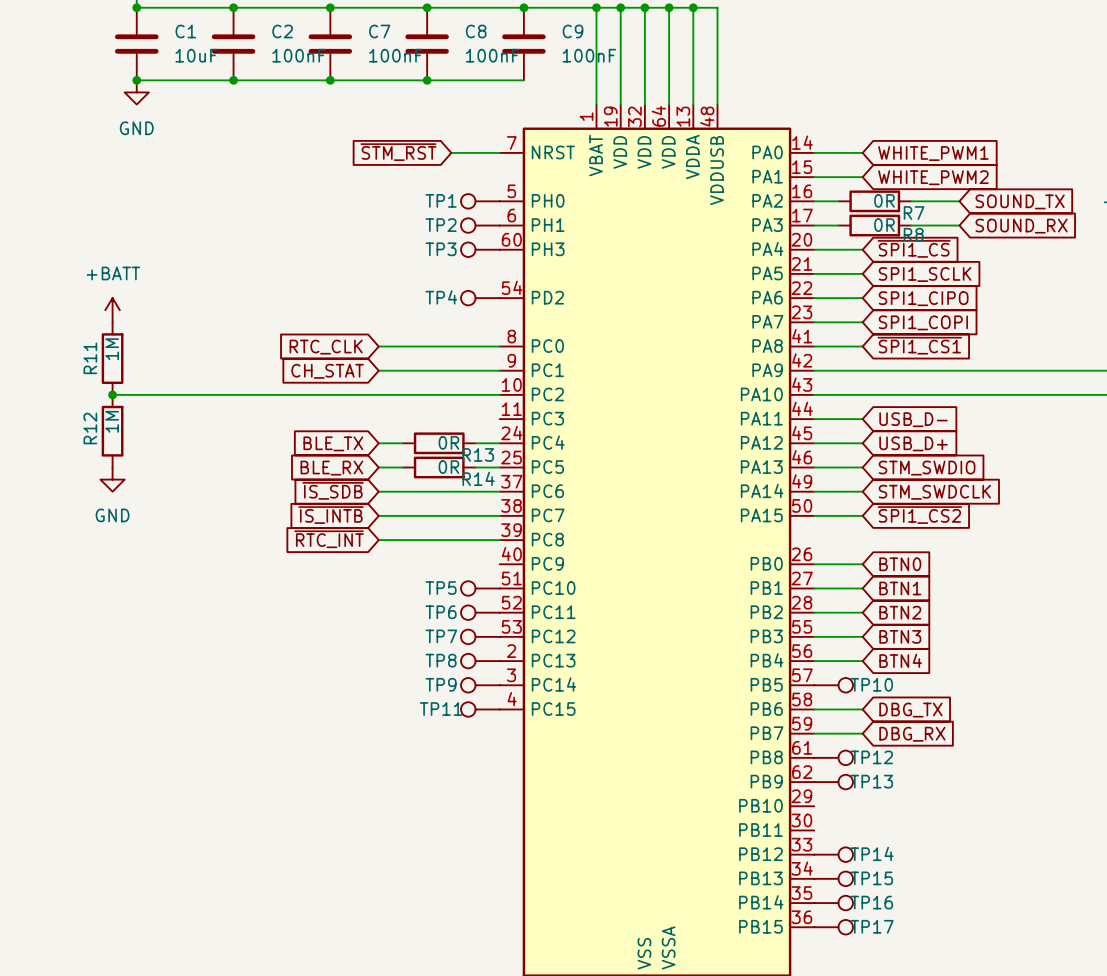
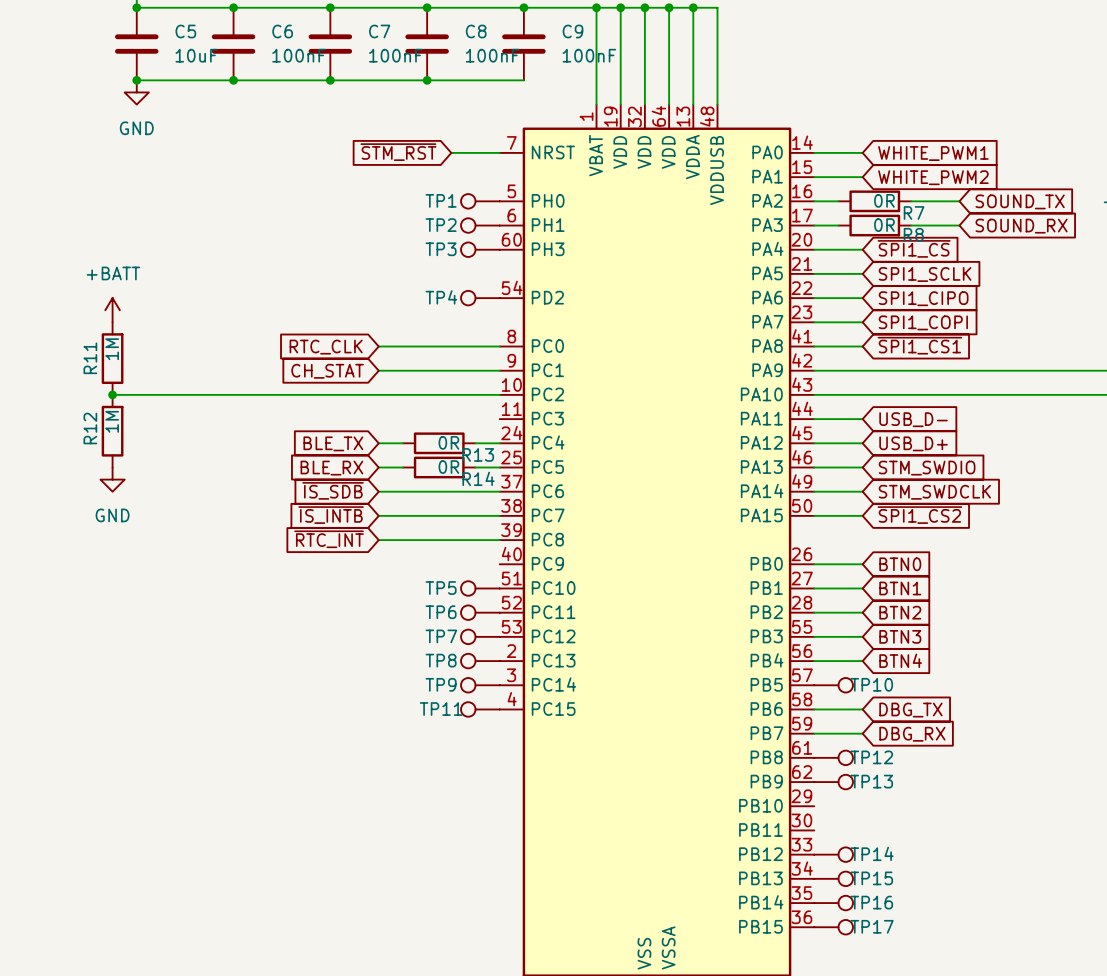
C1 name: C1 (185, 31) -> C5 (185, 31)
C2 name: C2 (282, 31) -> C6 (282, 31)

